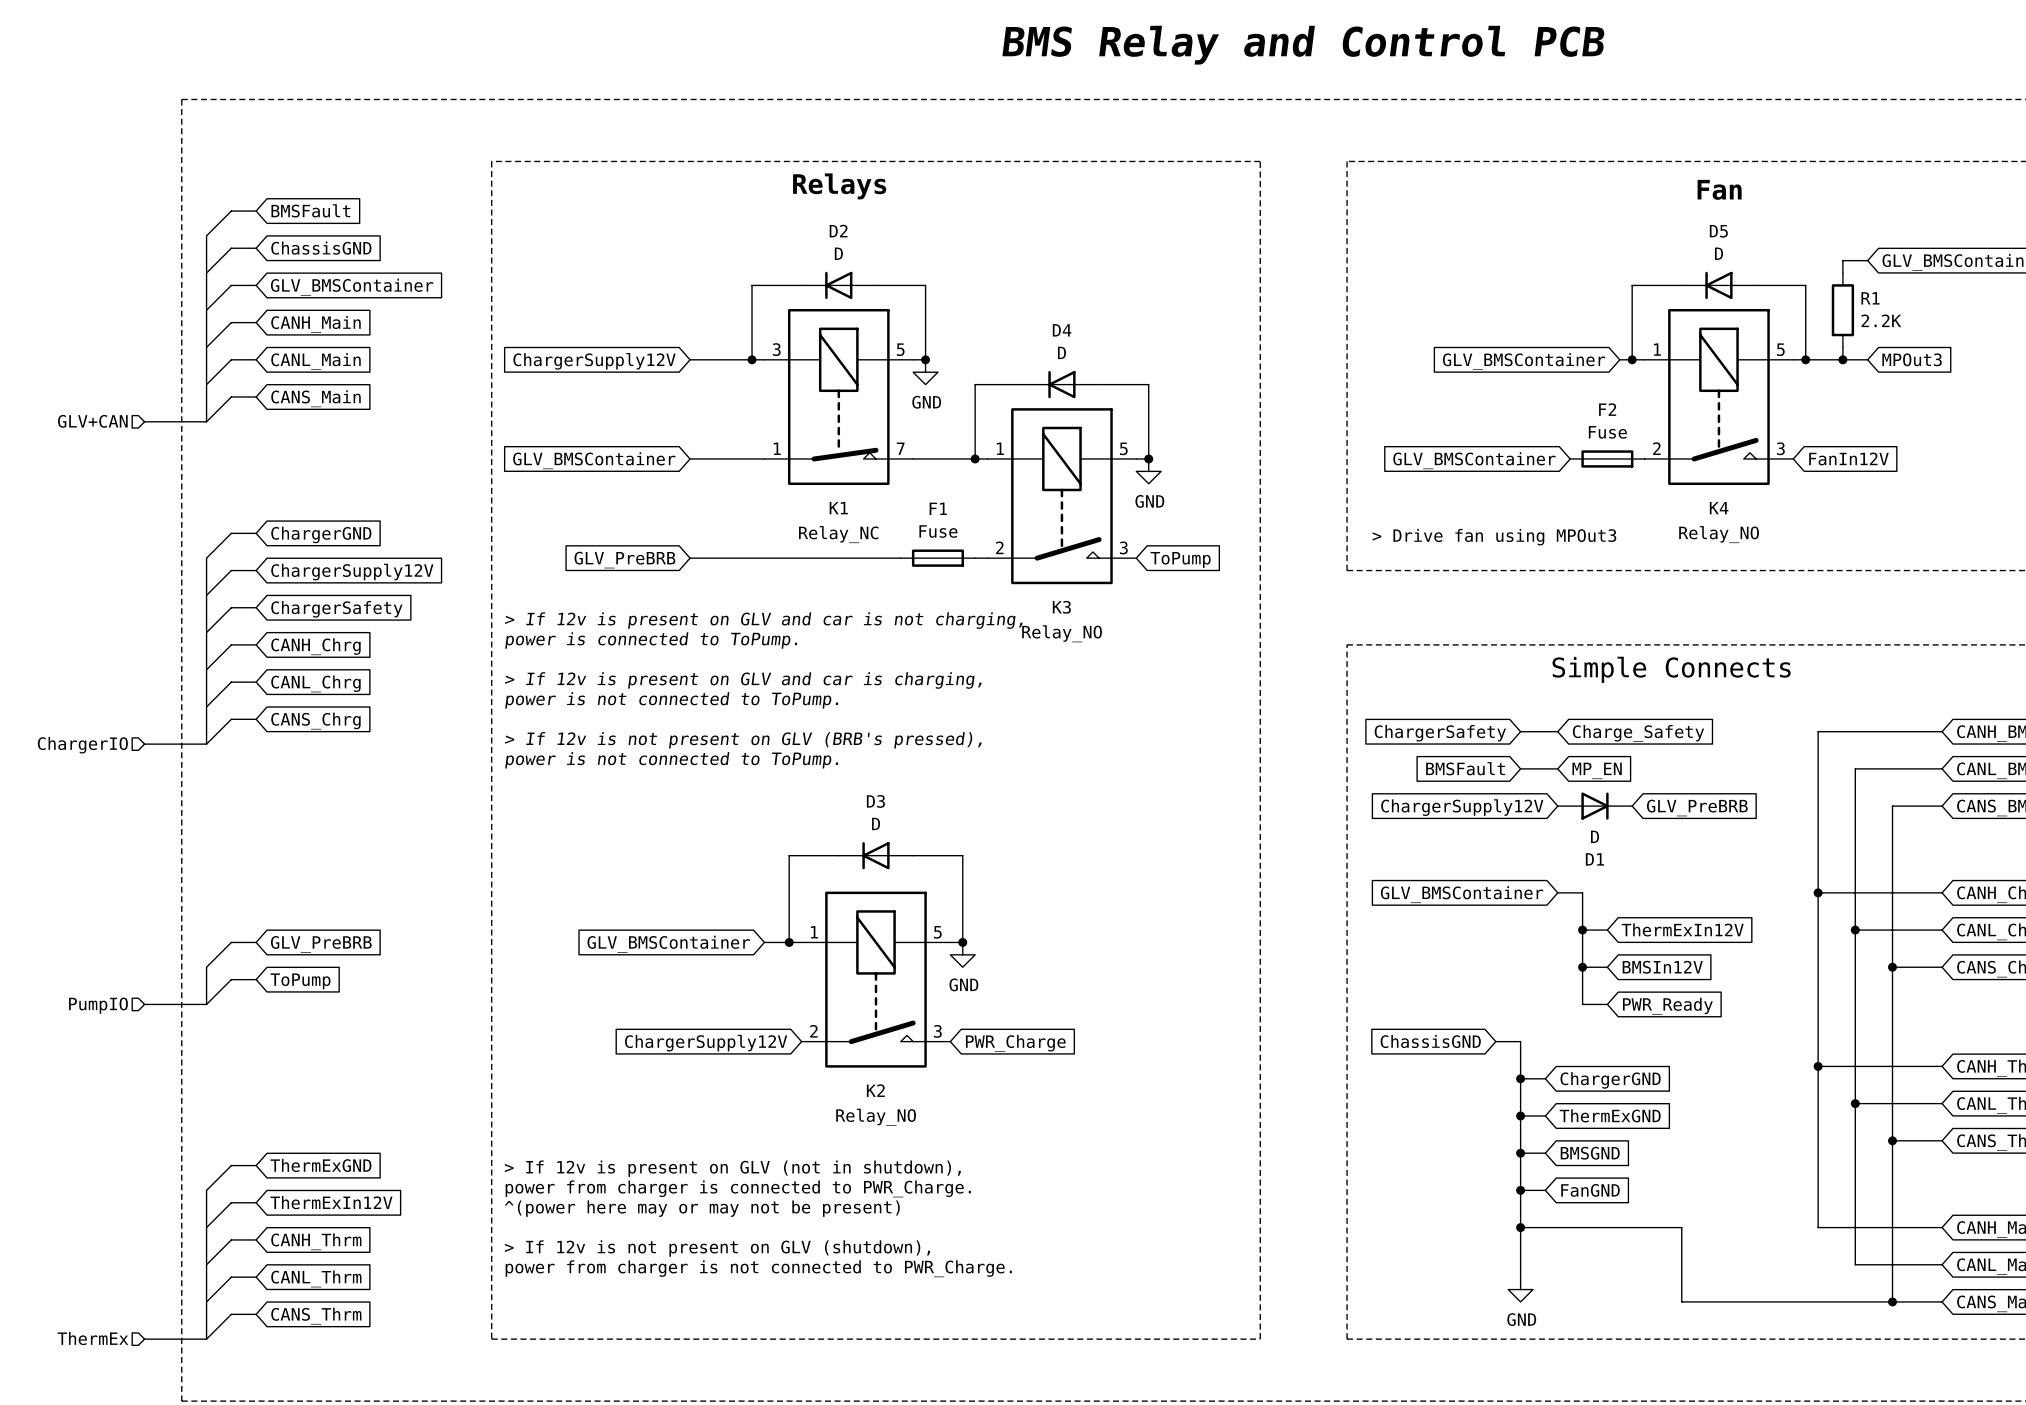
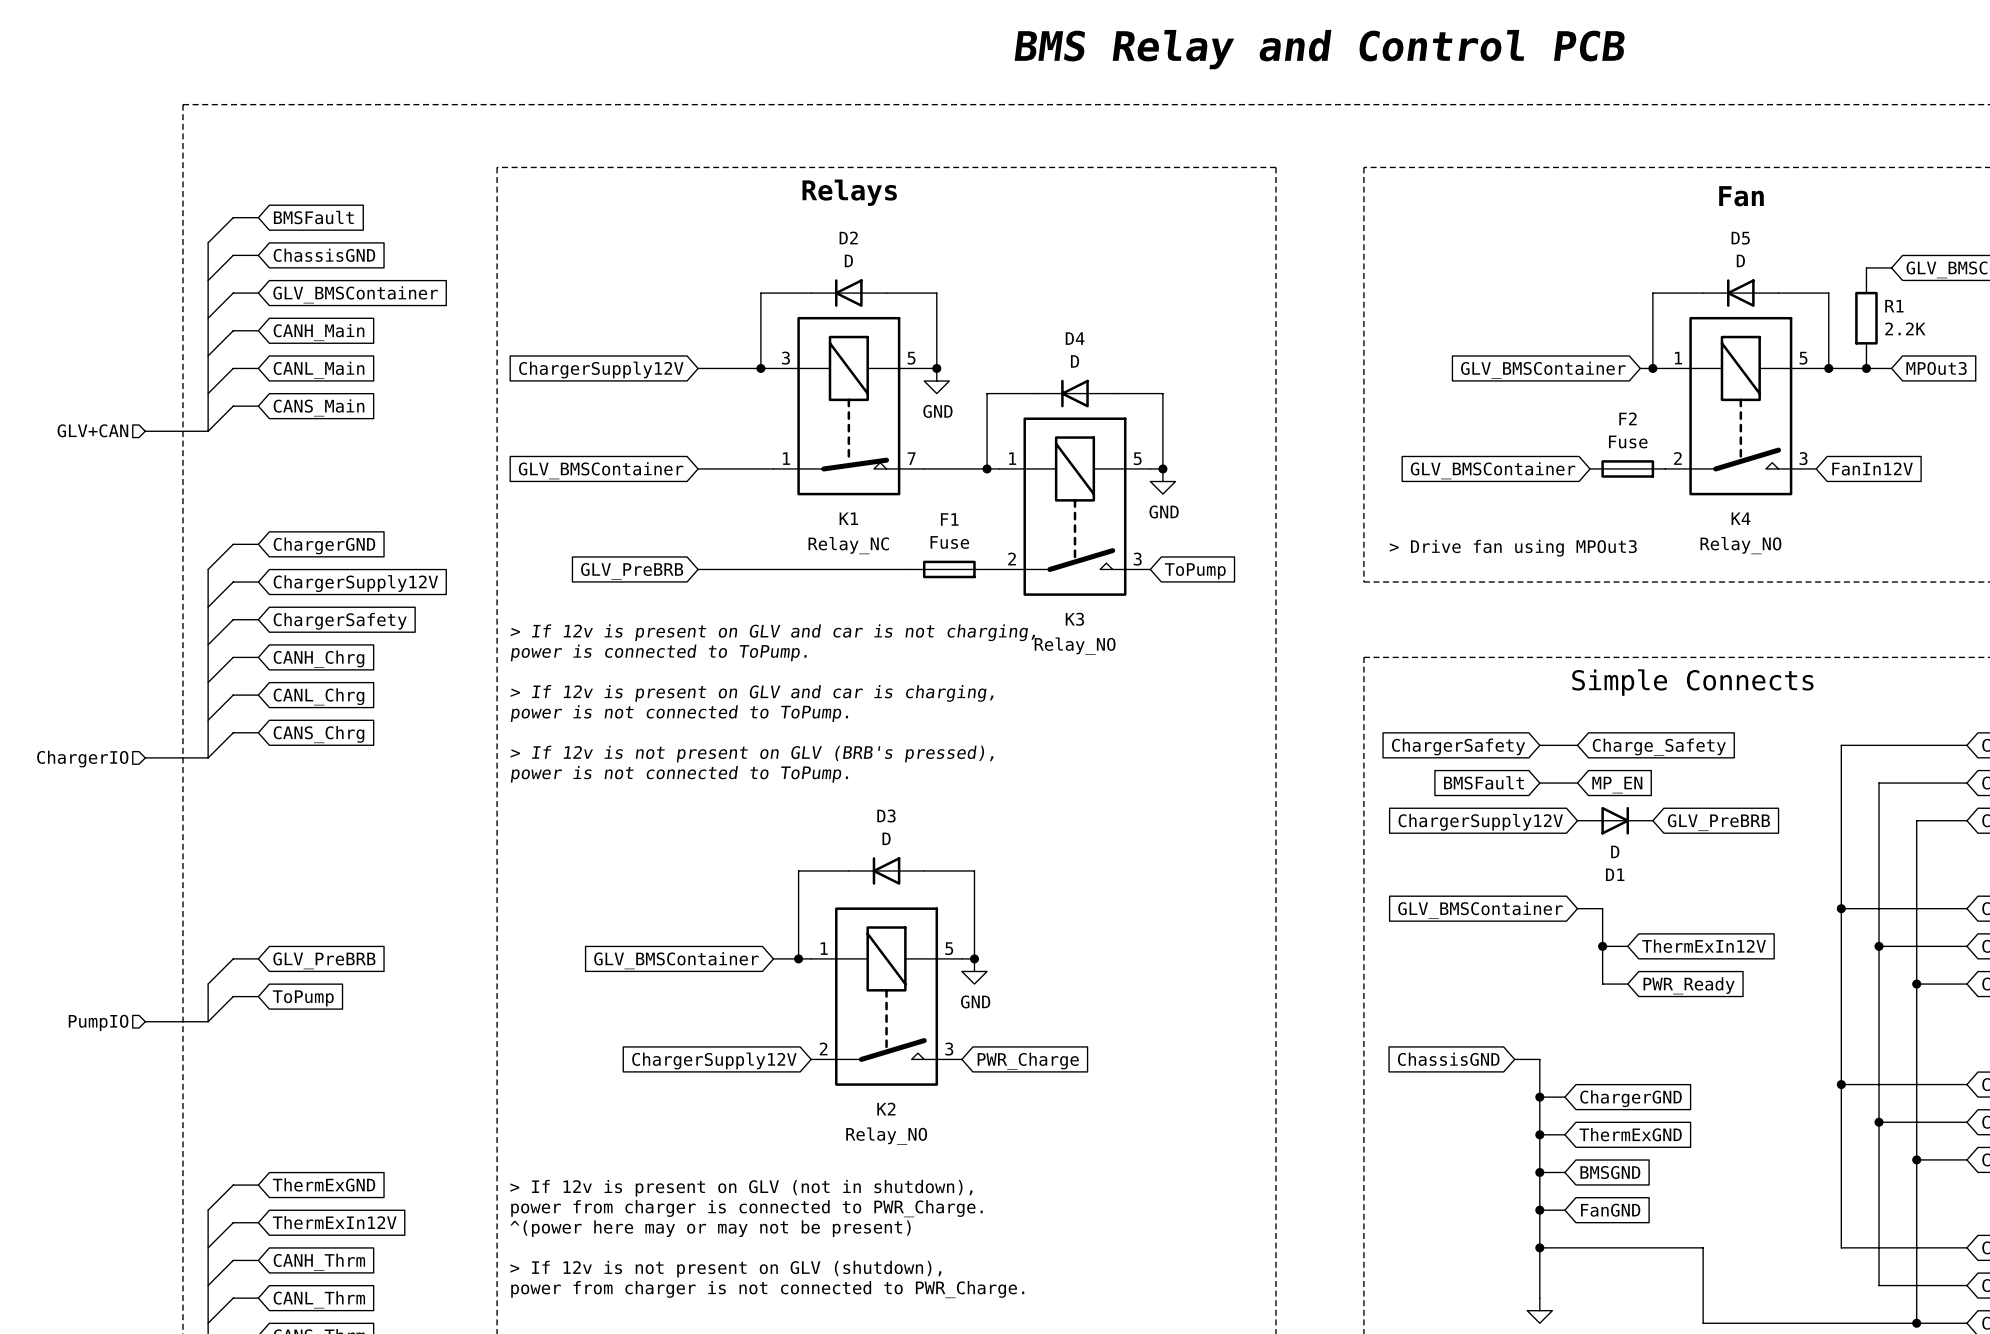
wire: (1582, 967) (1582, 1004) (1607, 1004) -> none
junction: (1582, 967) -> none
global label: BMSIn12V (1662, 967) -> PWR_Ready (1689, 985)
global label: PWR_Ready (1667, 1006) -> none

